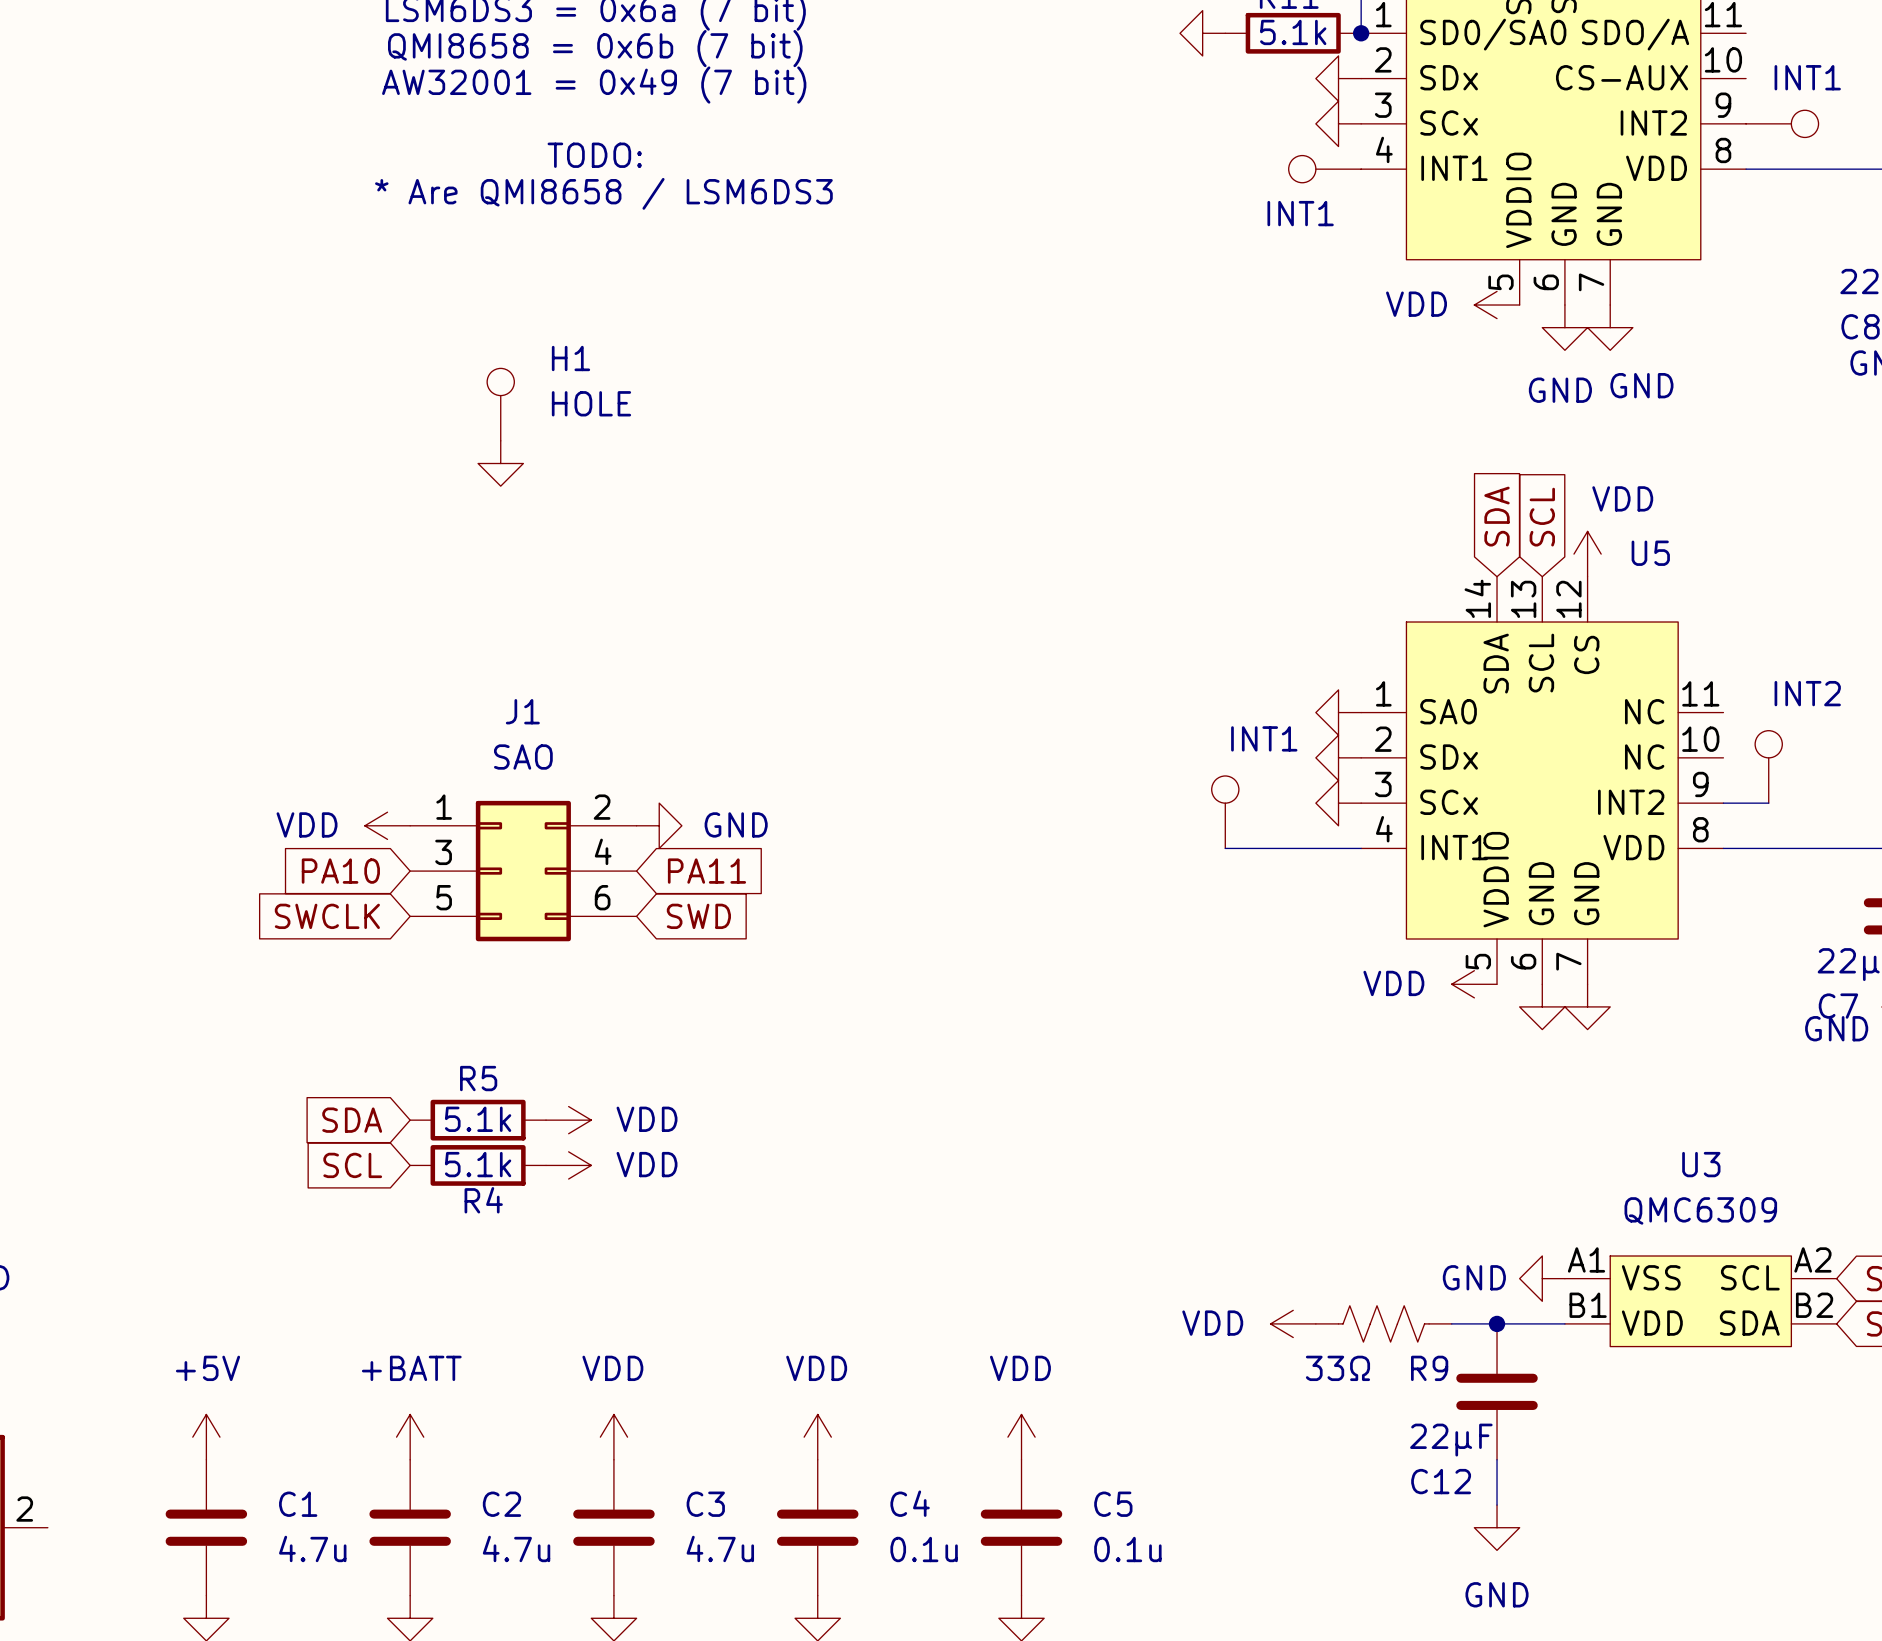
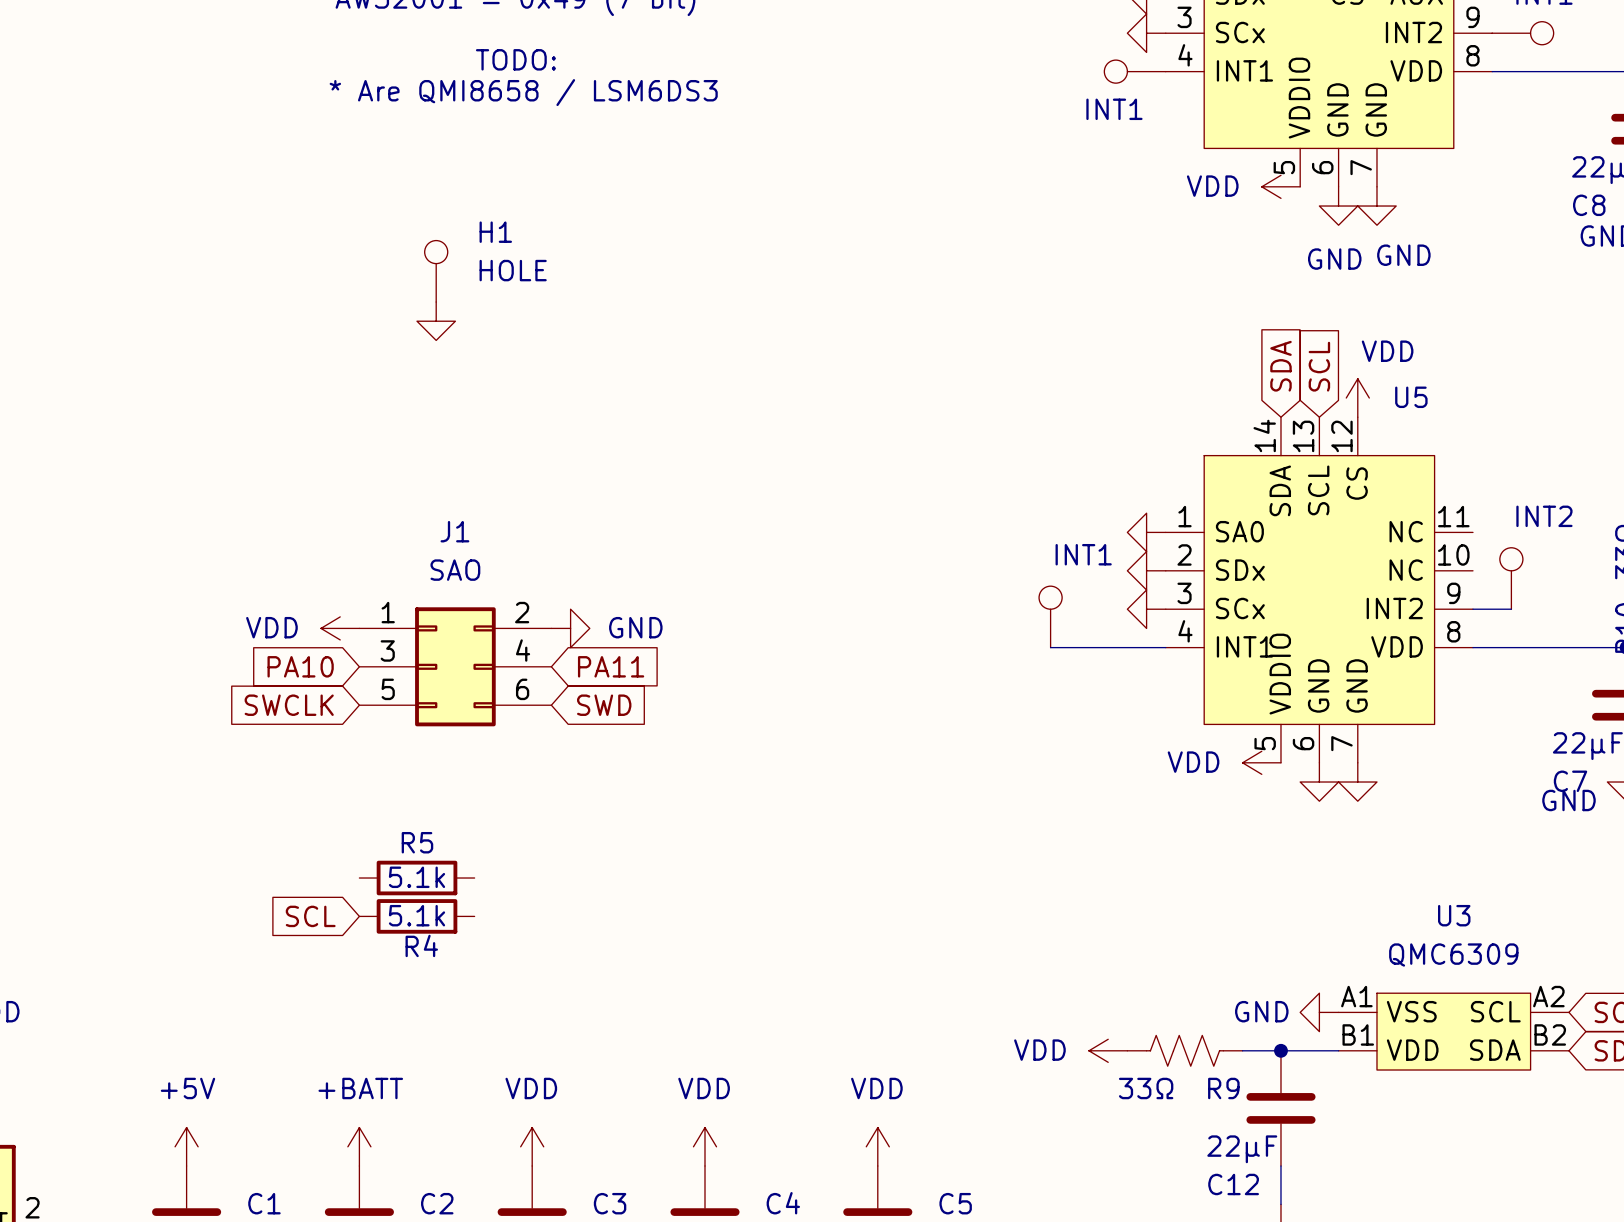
global label: SDA (352, 1120) -> none
power symbol: VDD (568, 1120) -> none
power symbol: VDD (568, 1165) -> none

